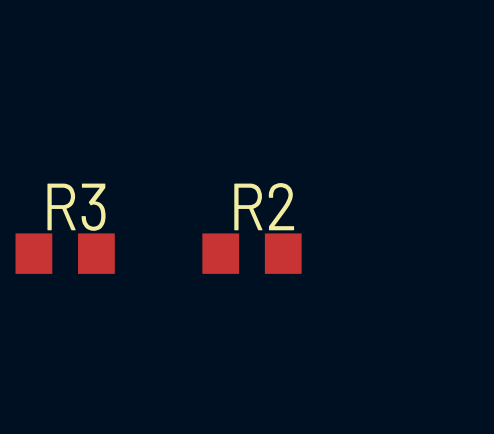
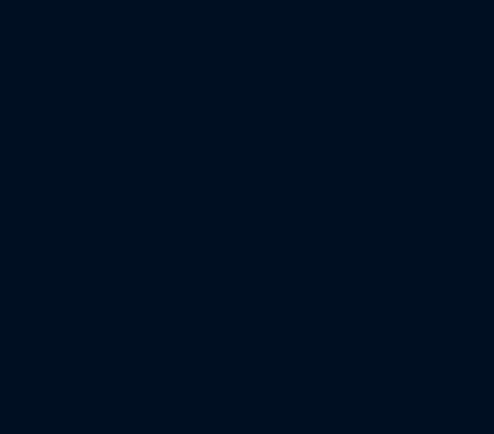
R3: (65, 253) -> none
R2: (252, 253) -> none

